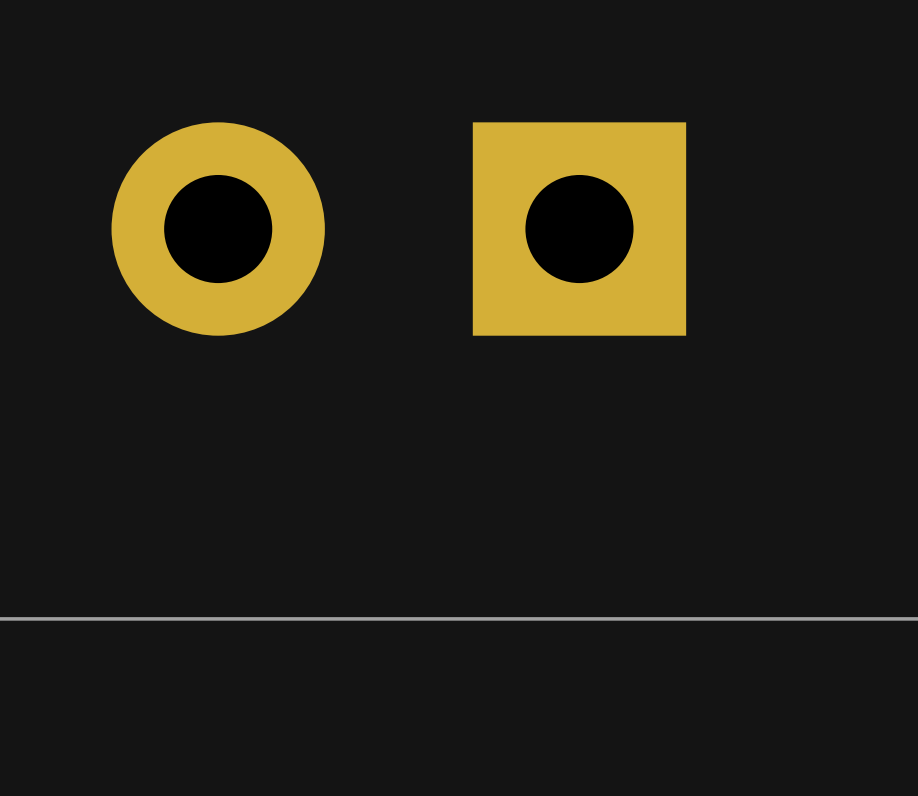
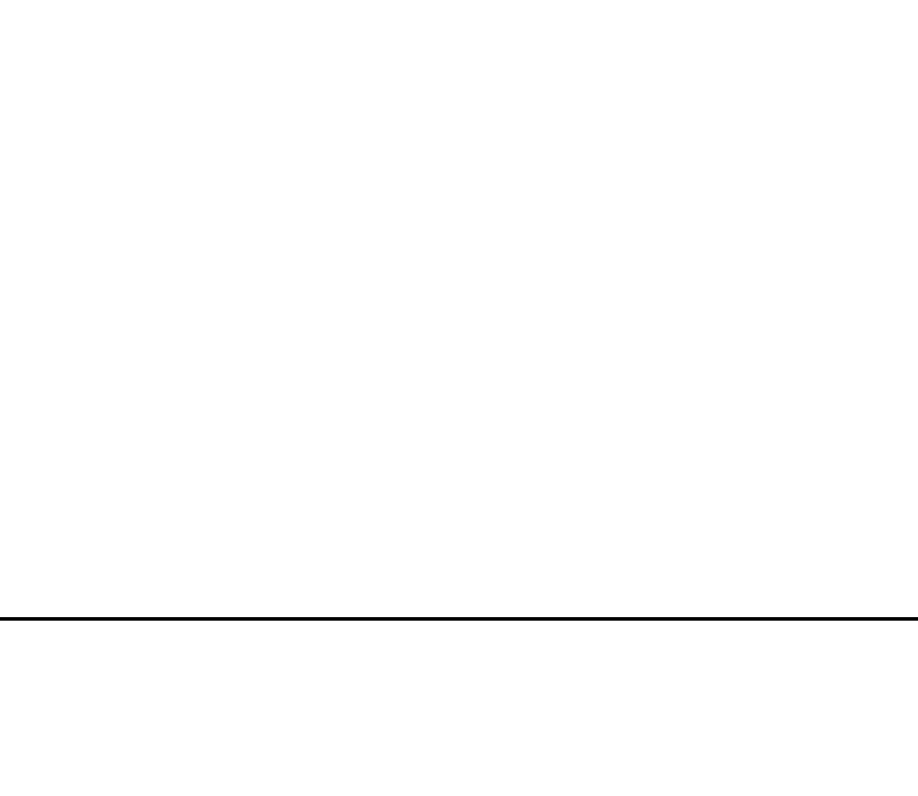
part: (398, 229) -> none

